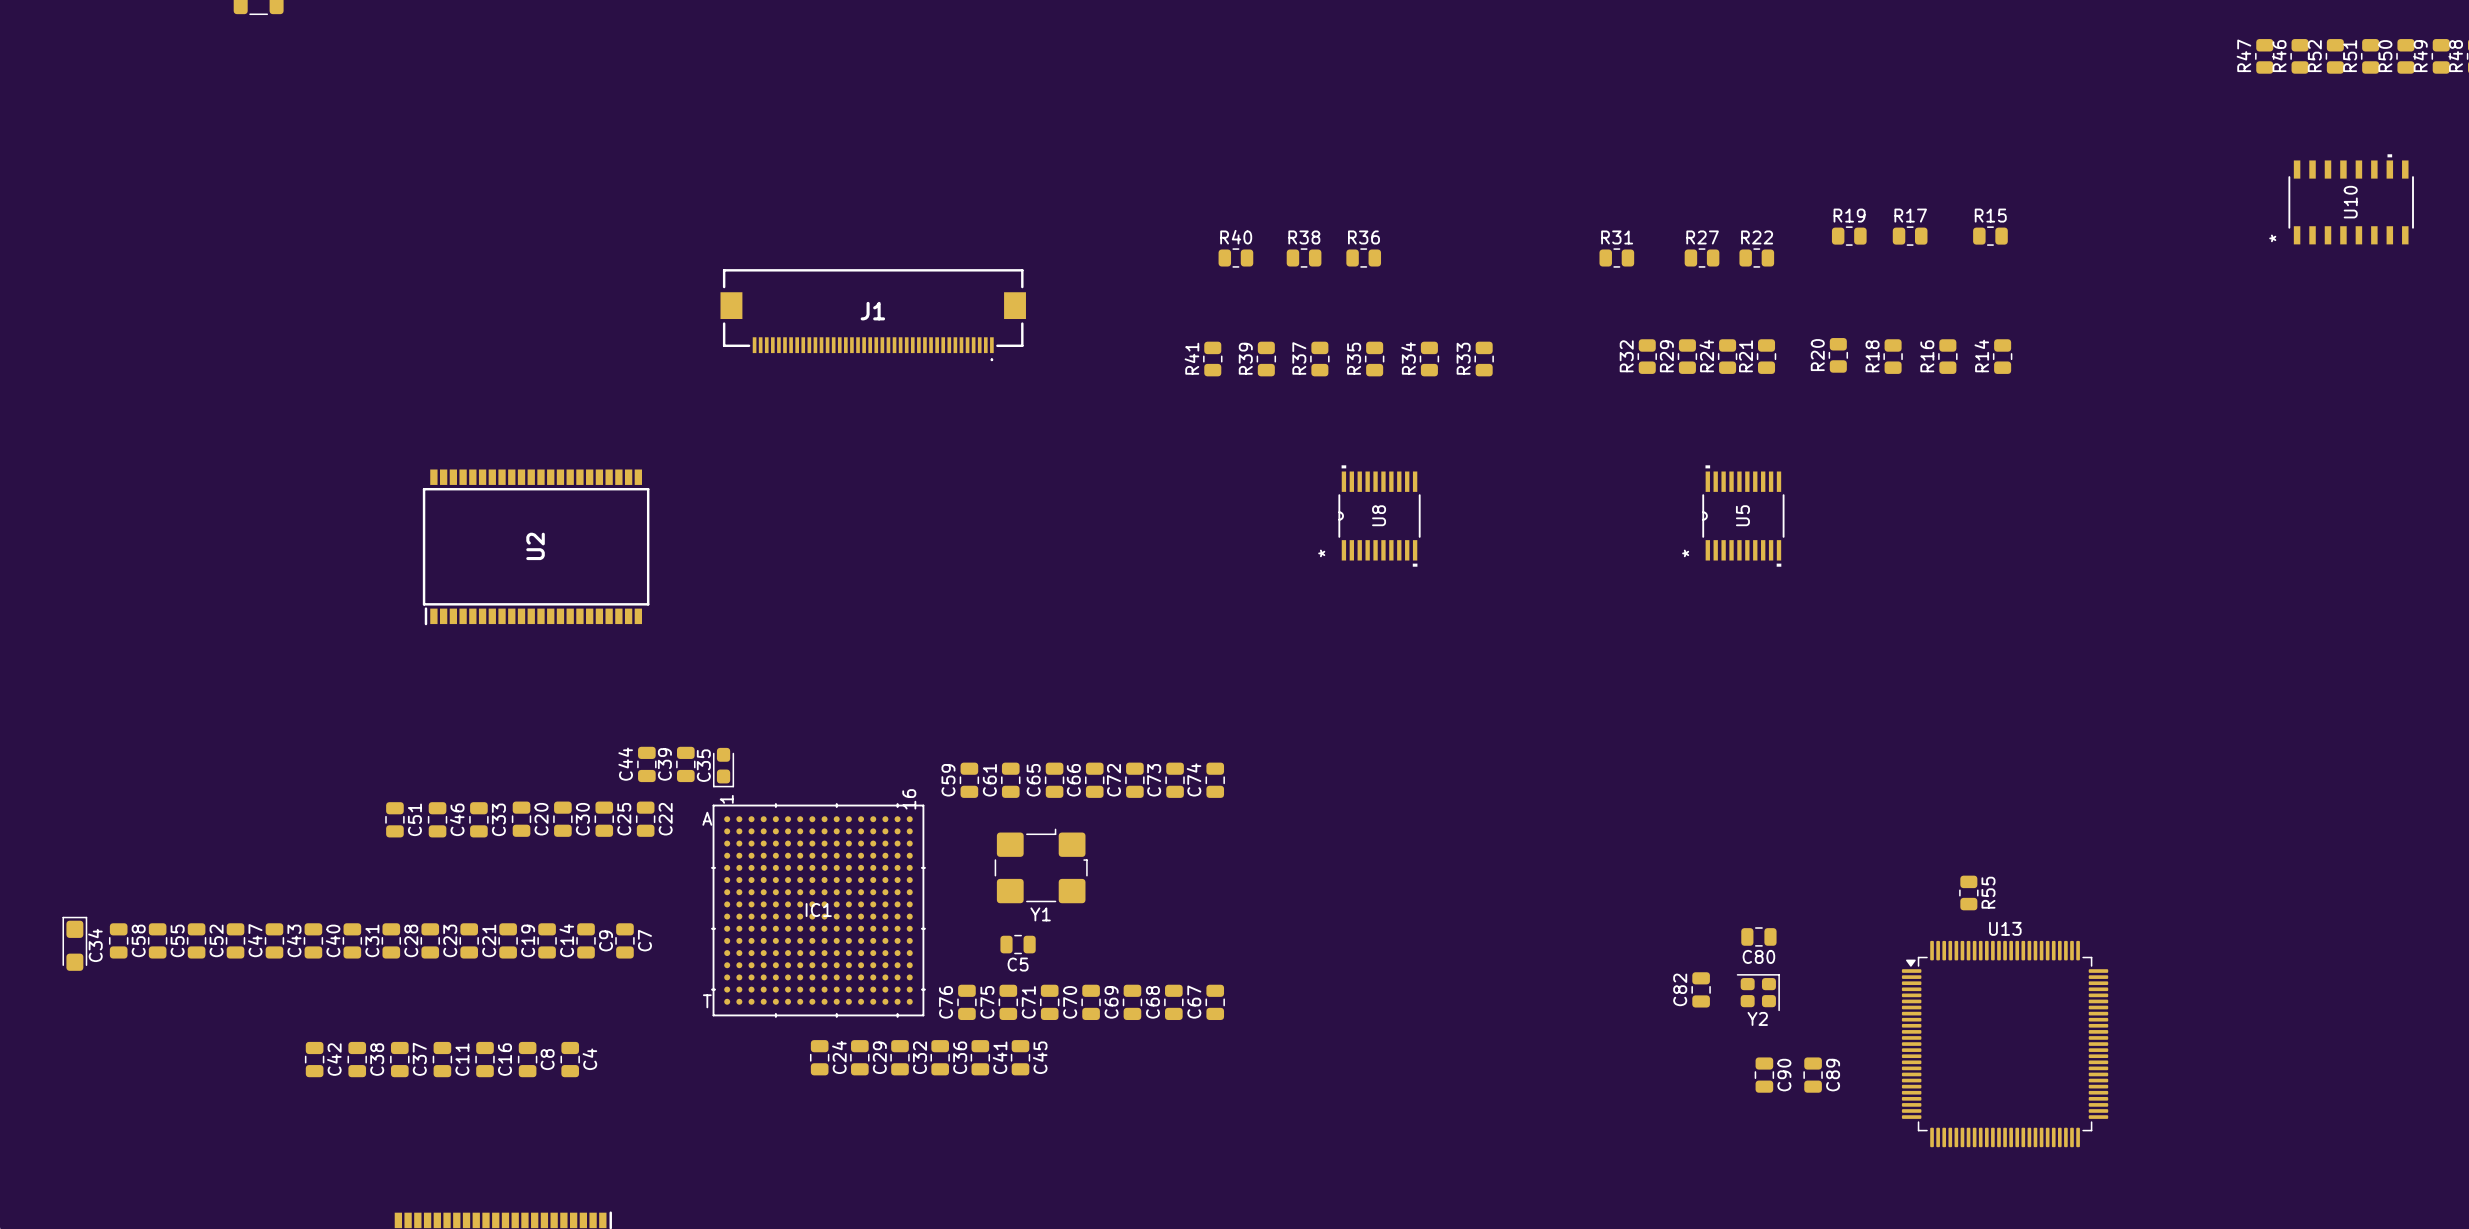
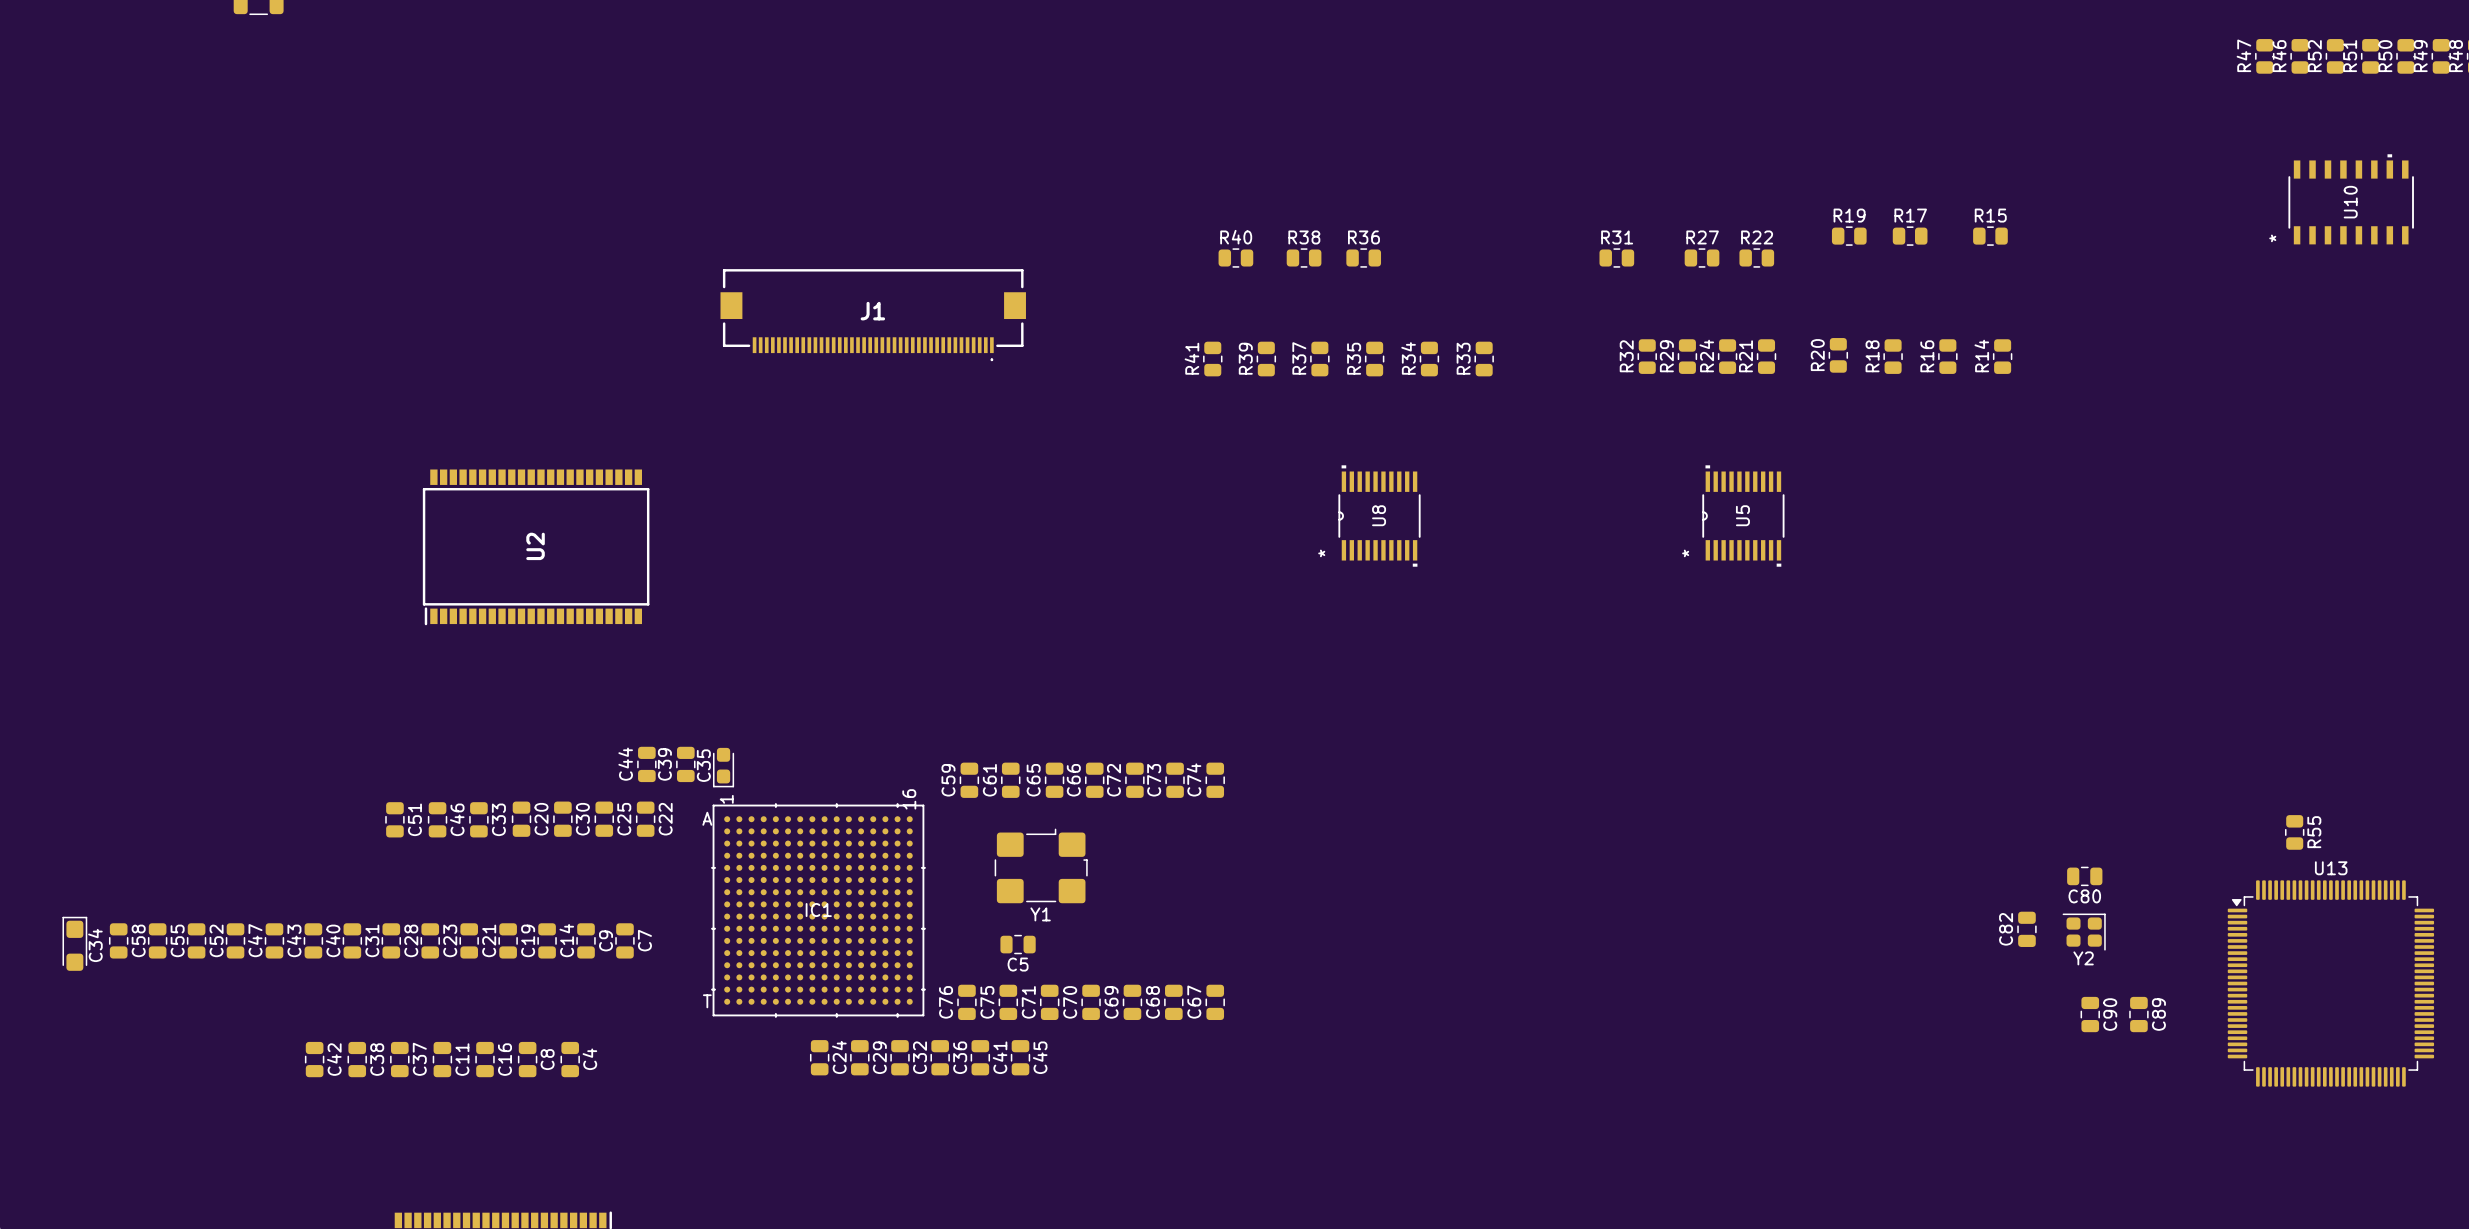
R55 position: (1968, 892) -> (2294, 832)
C80 position: (1758, 936) -> (2084, 876)
C82 position: (1701, 989) -> (2026, 929)
Y2 position: (1758, 992) -> (2084, 932)
U13 position: (2005, 1044) -> (2330, 983)
C90 position: (1764, 1075) -> (2090, 1014)
C89 position: (1813, 1075) -> (2138, 1014)

